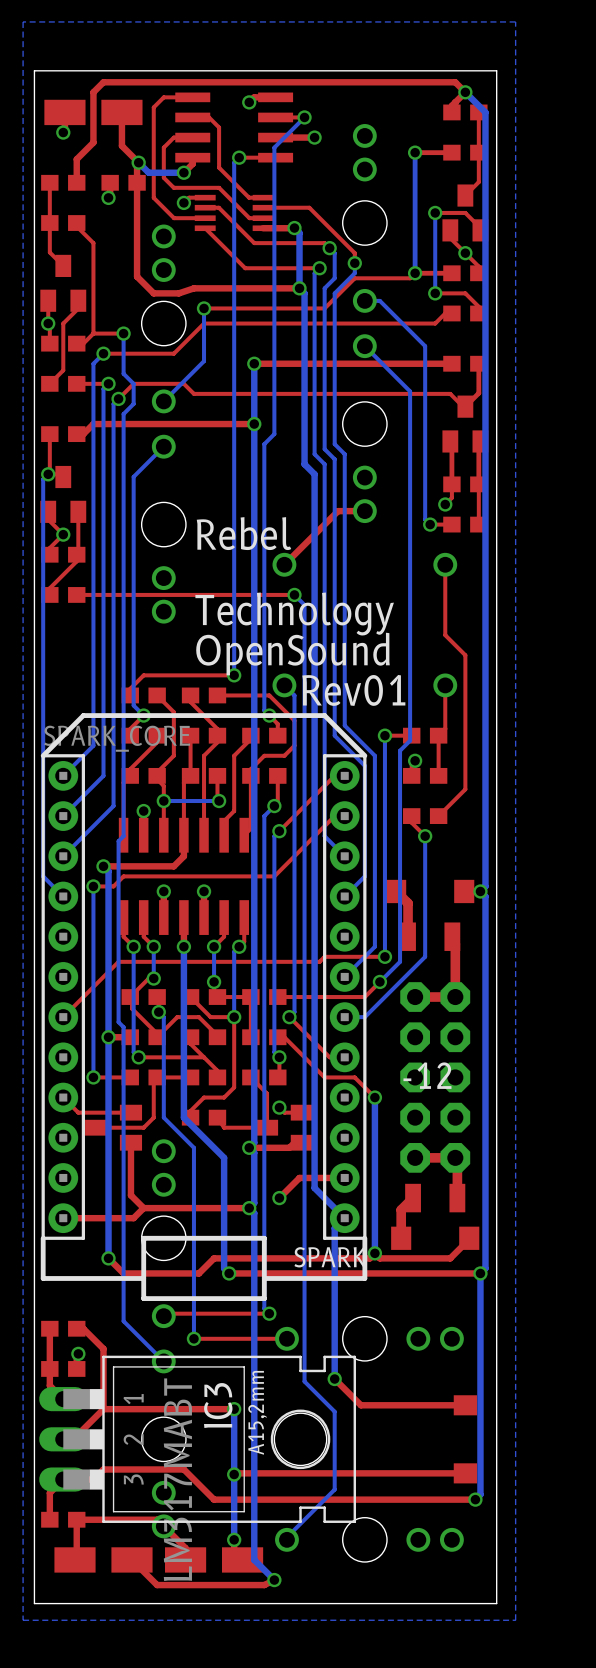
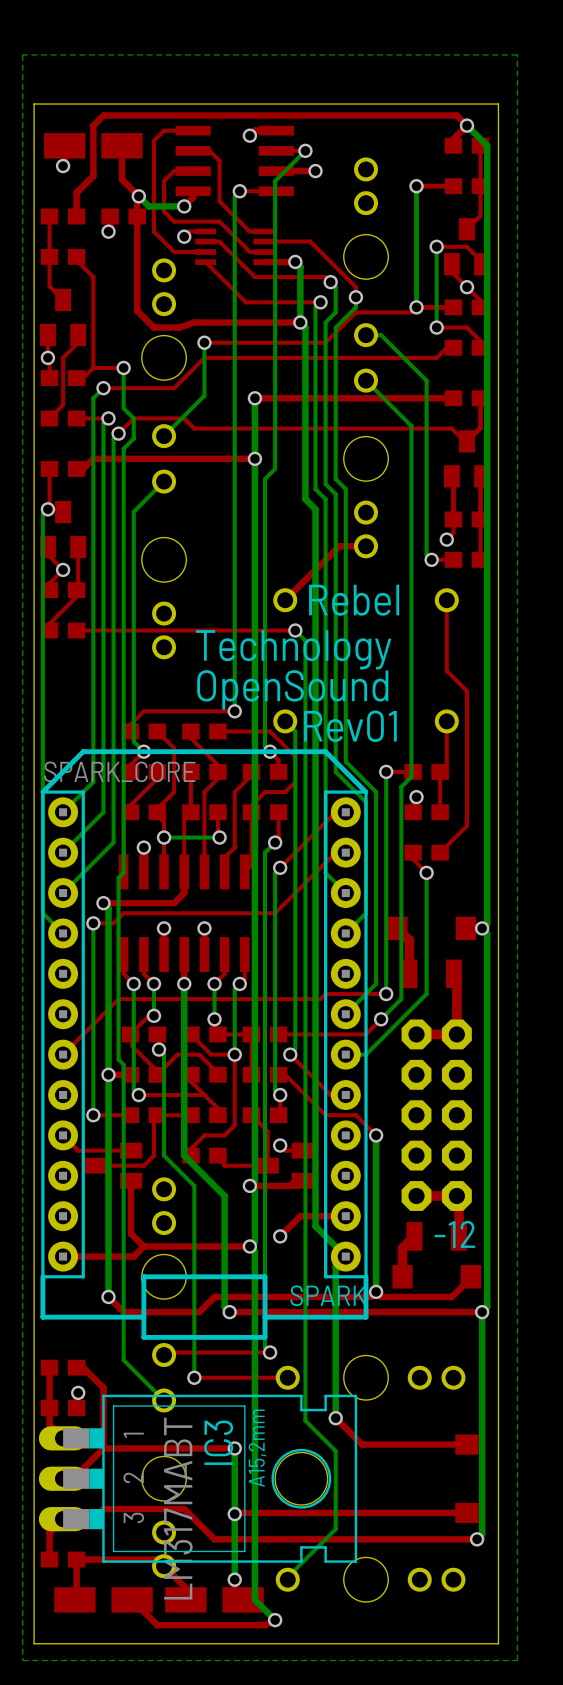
text position: Rebel (243, 533) -> Rebel (354, 600)
text position: -12 (427, 1075) -> -12 (454, 1234)

